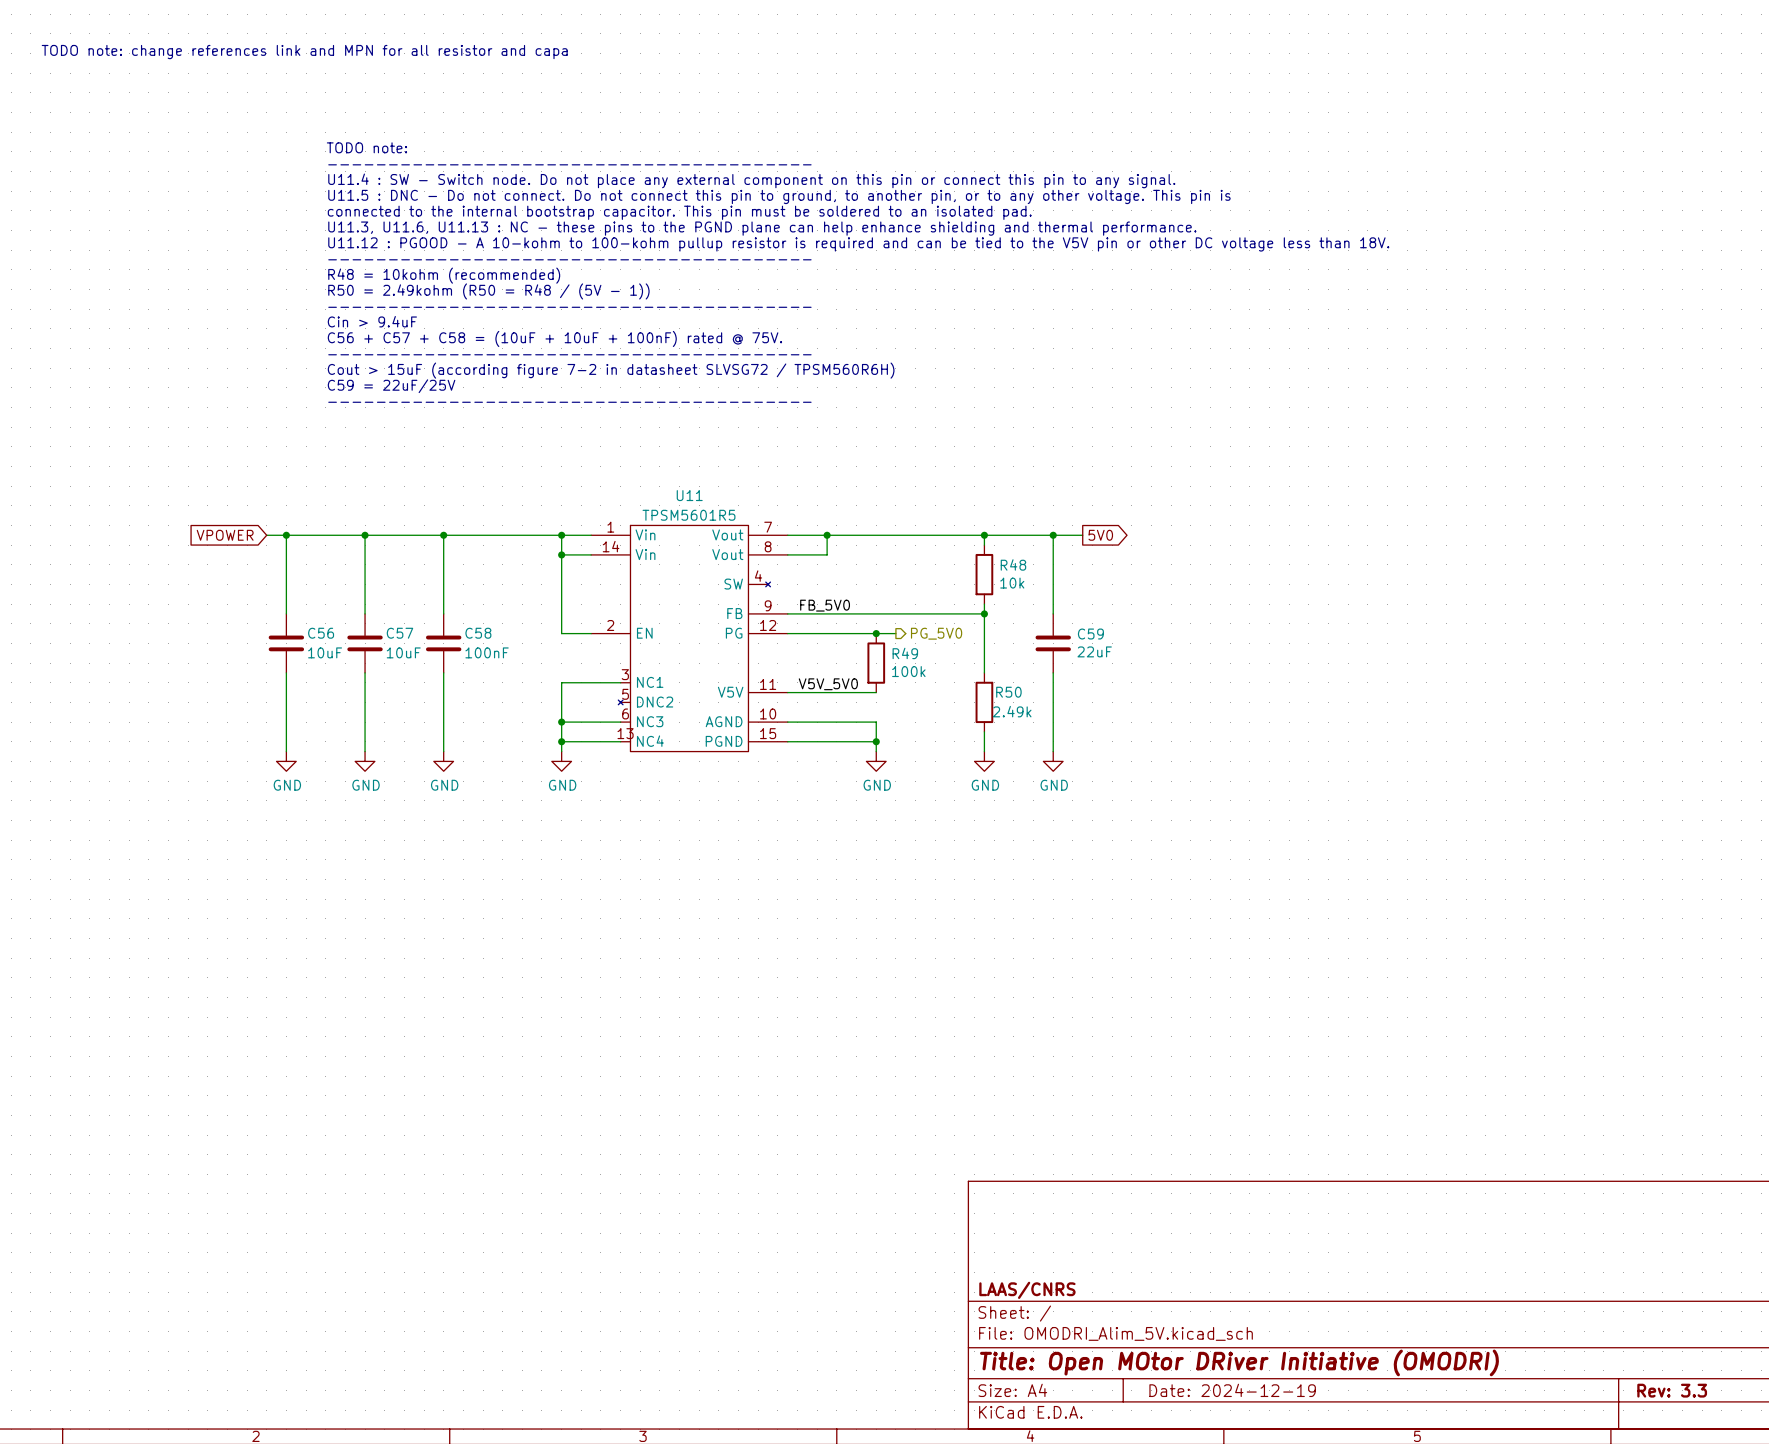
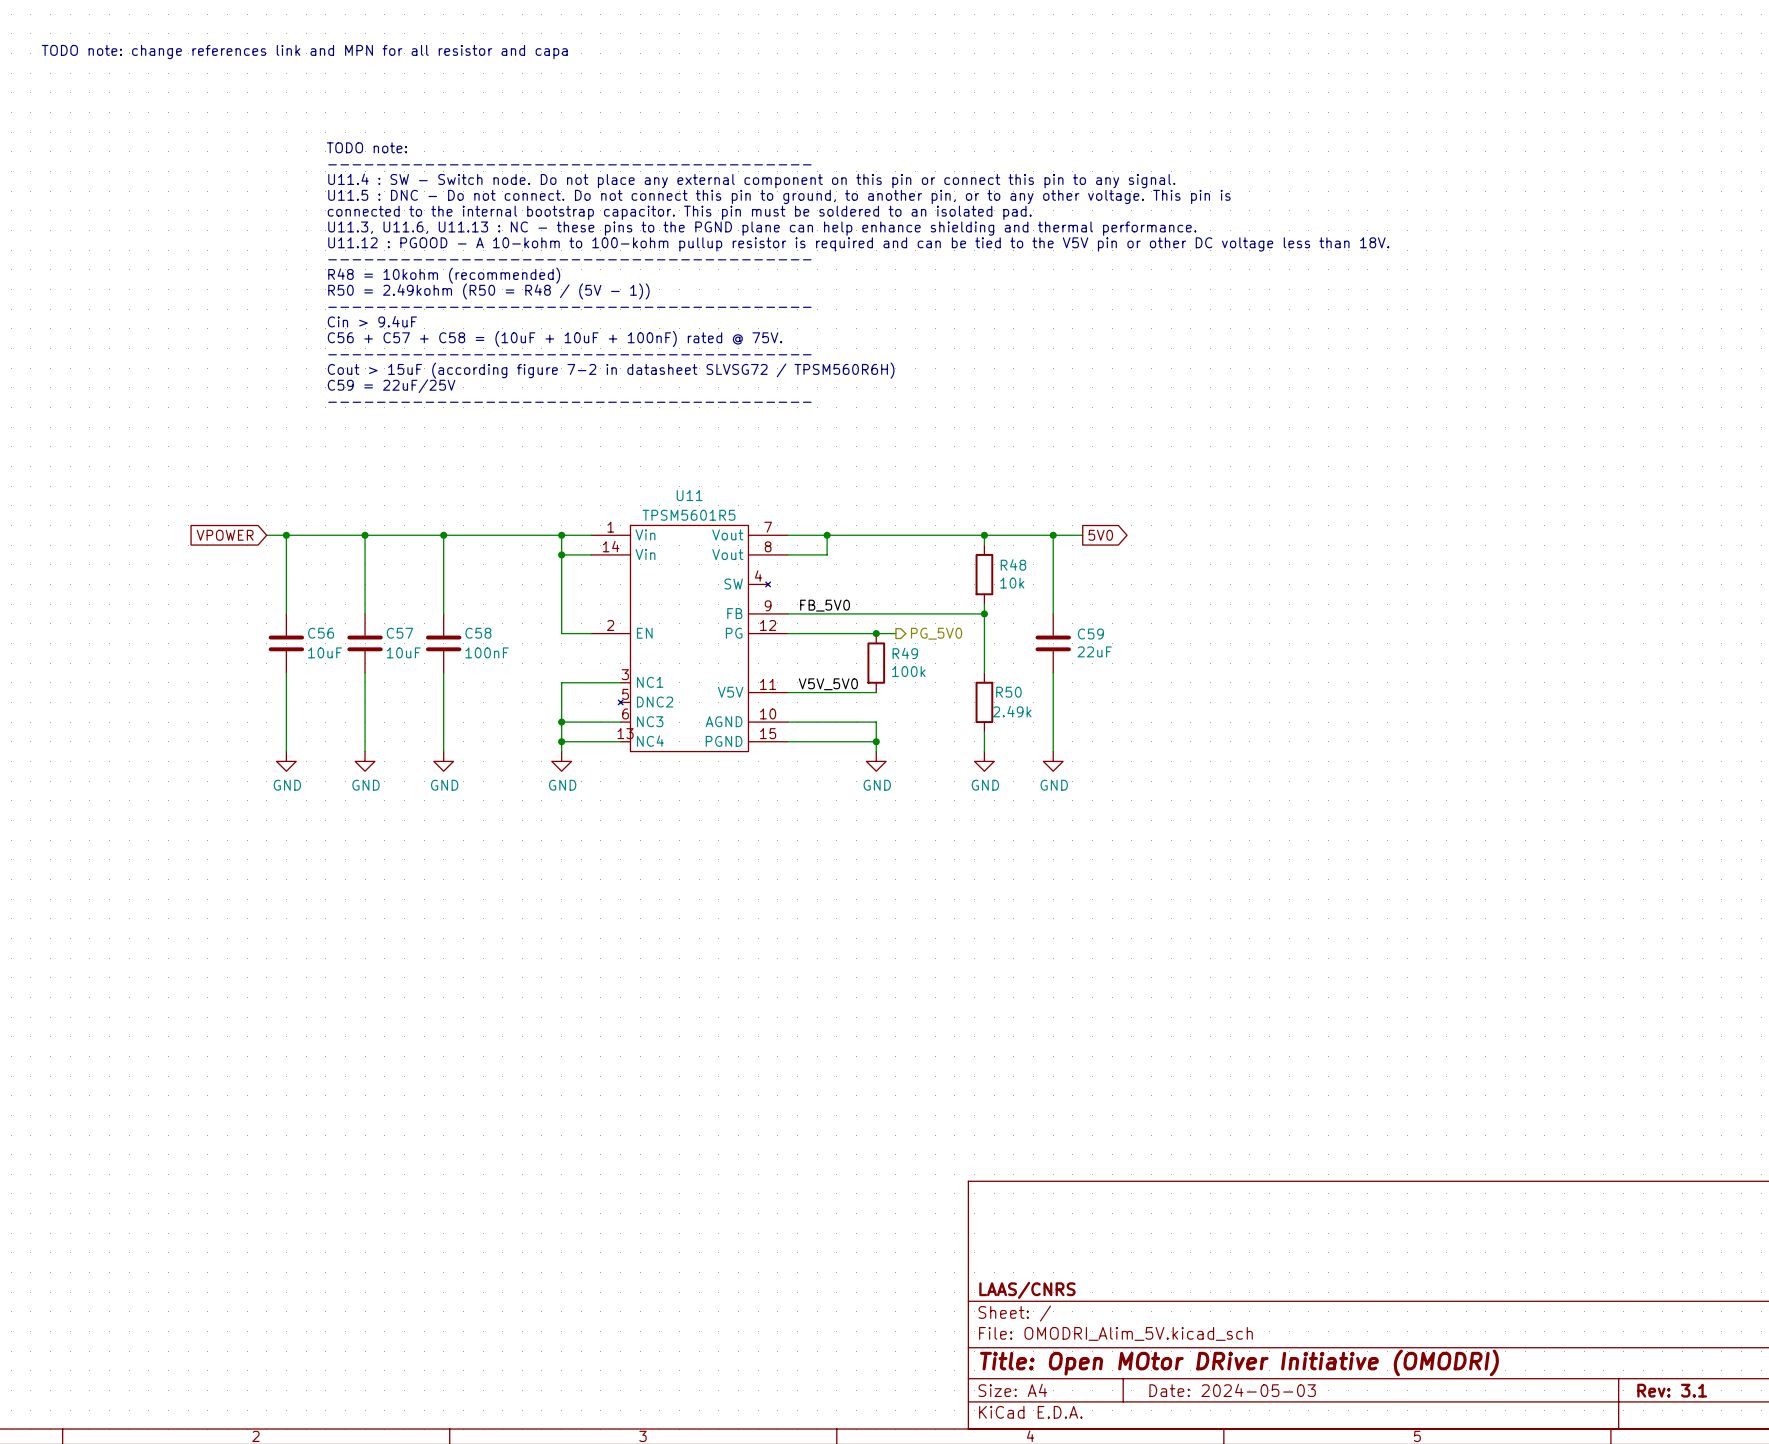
title block: Date: 2024-12-19 (1232, 1390) -> Date: 2024-05-03 (1232, 1390)
title block: Rev: 3.3 (1672, 1390) -> Rev: 3.1 (1672, 1390)

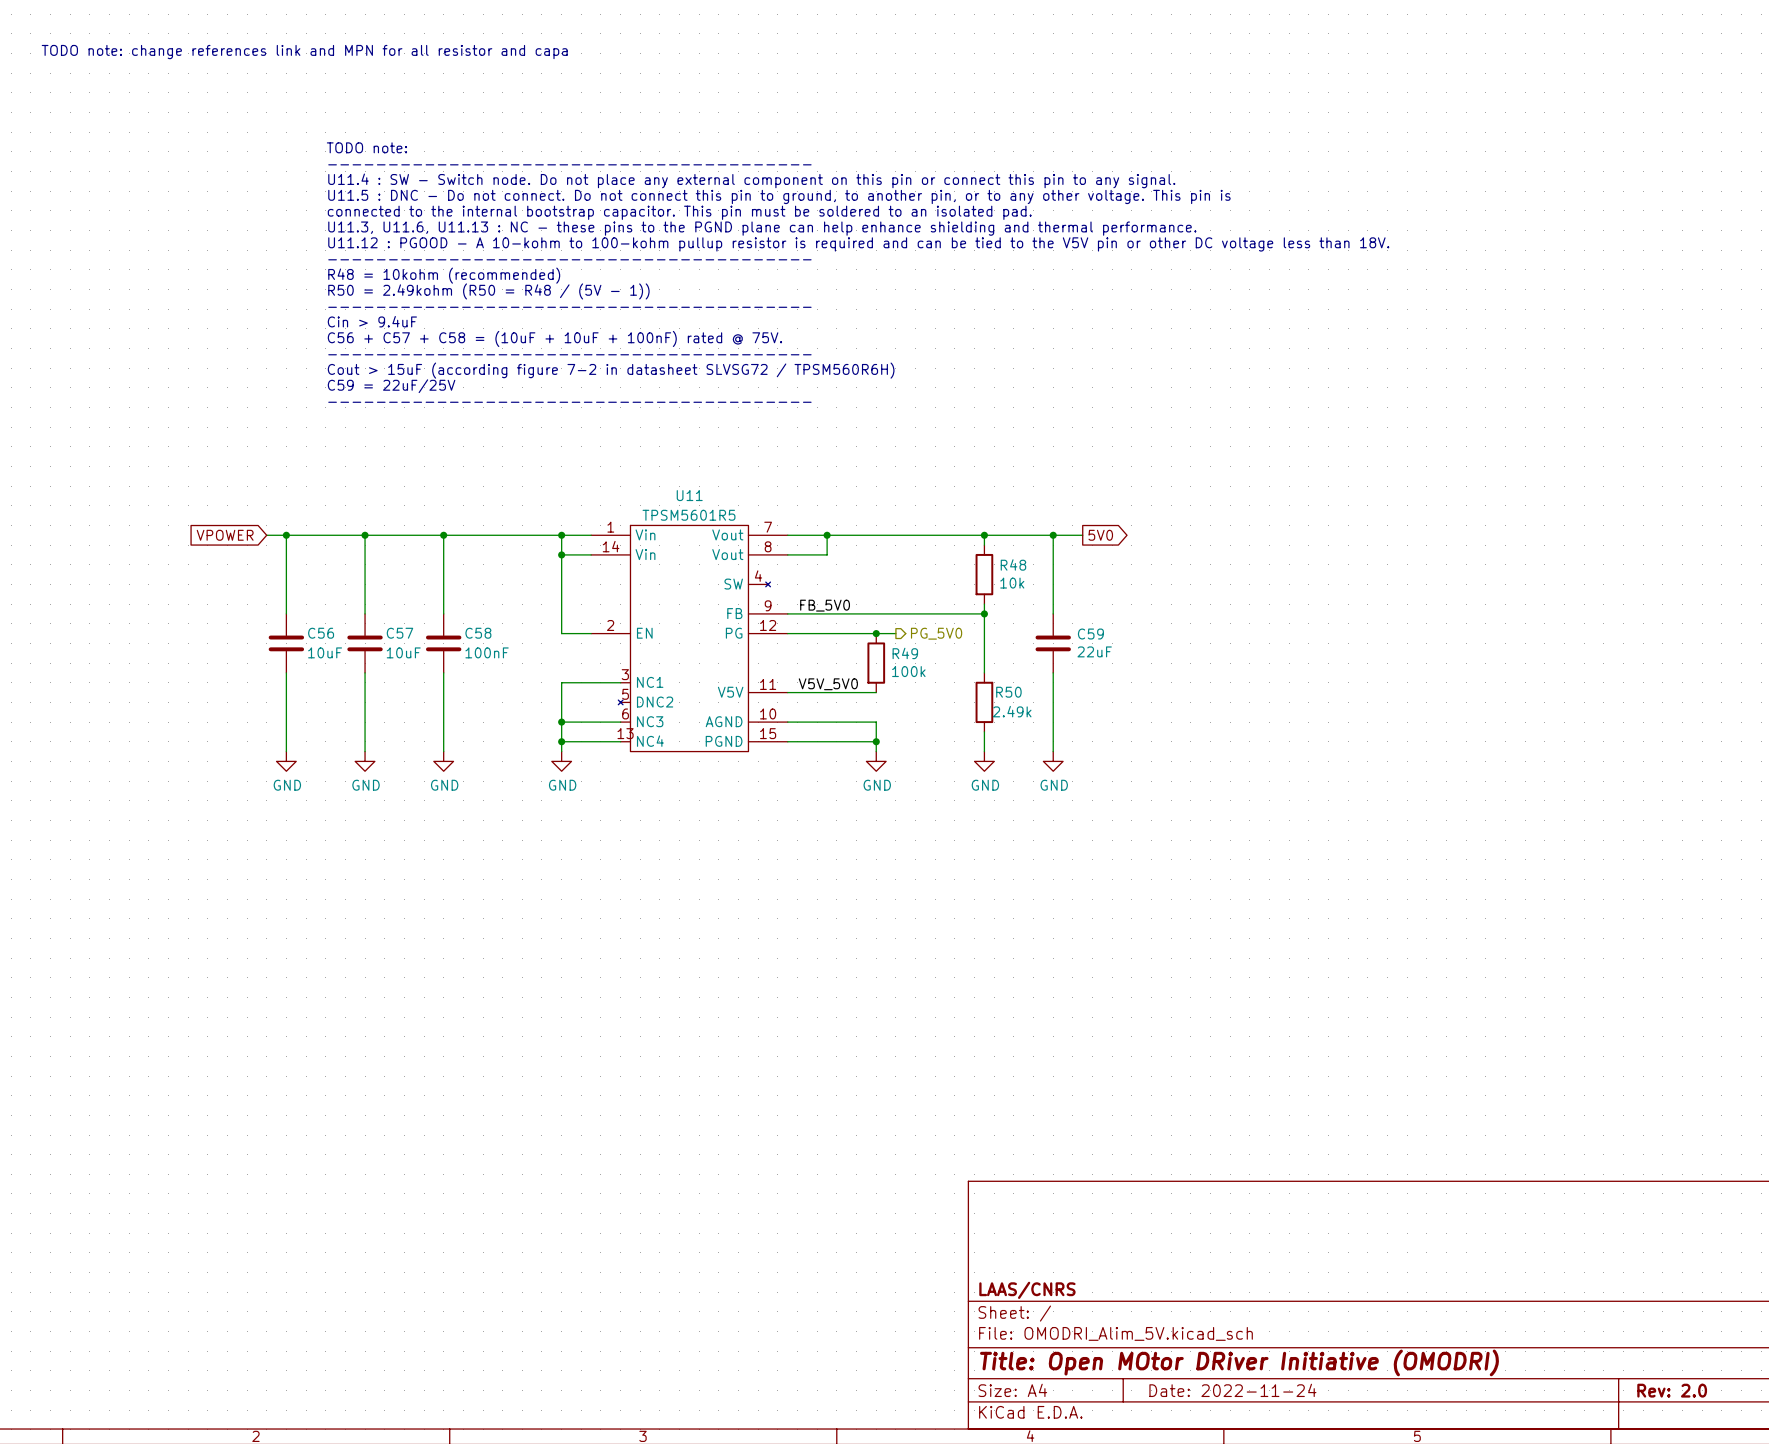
title block: Date: 2024-05-03 (1232, 1390) -> Date: 2022-11-24 (1232, 1390)
title block: Rev: 3.1 (1672, 1390) -> Rev: 2.0 (1672, 1390)

